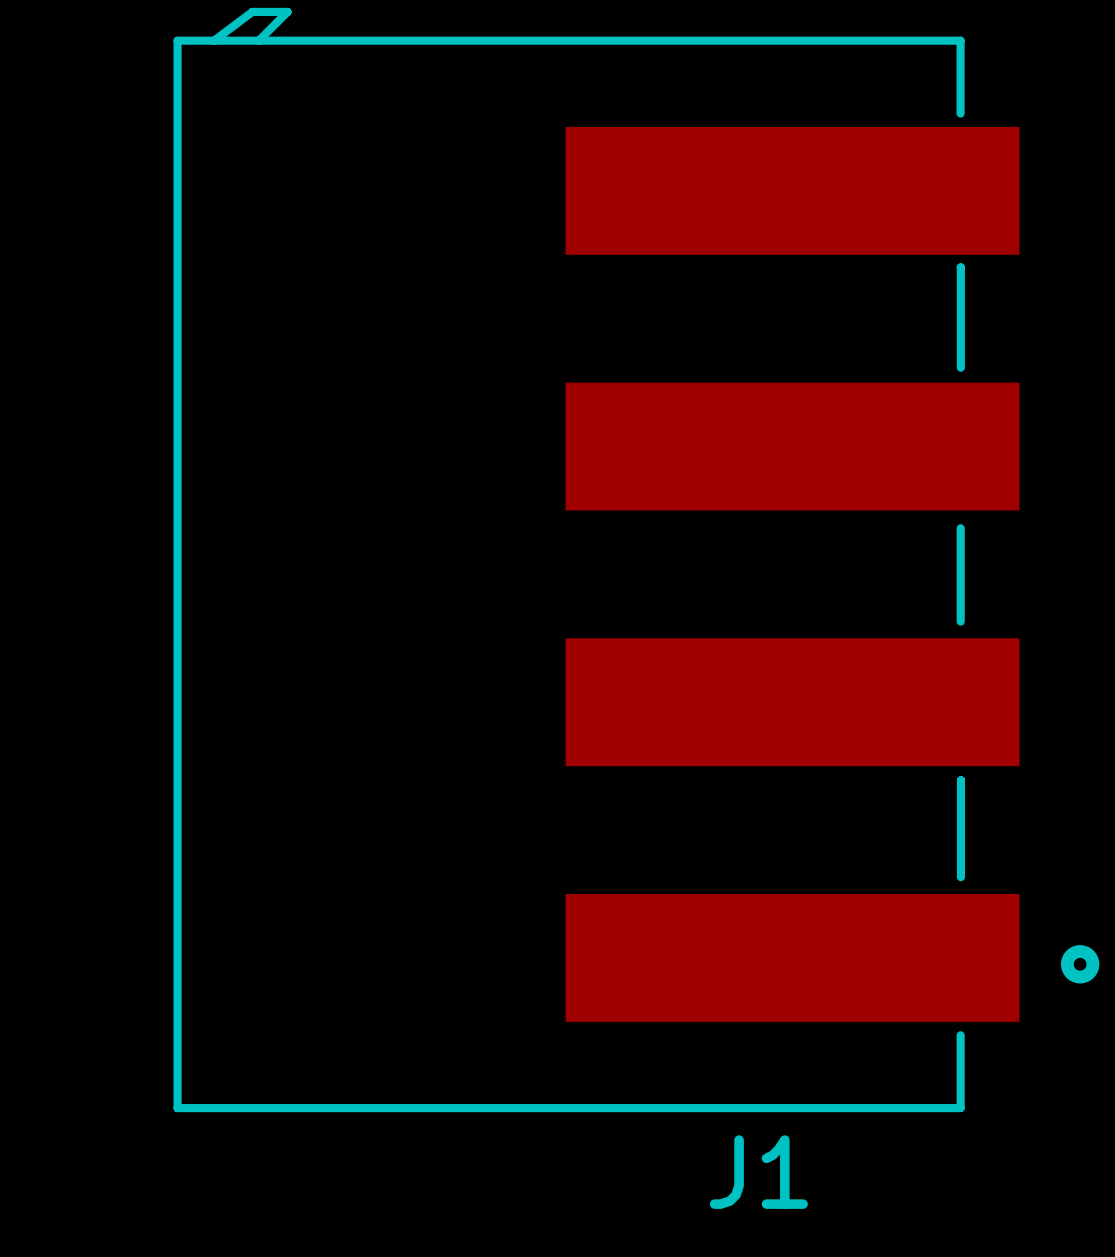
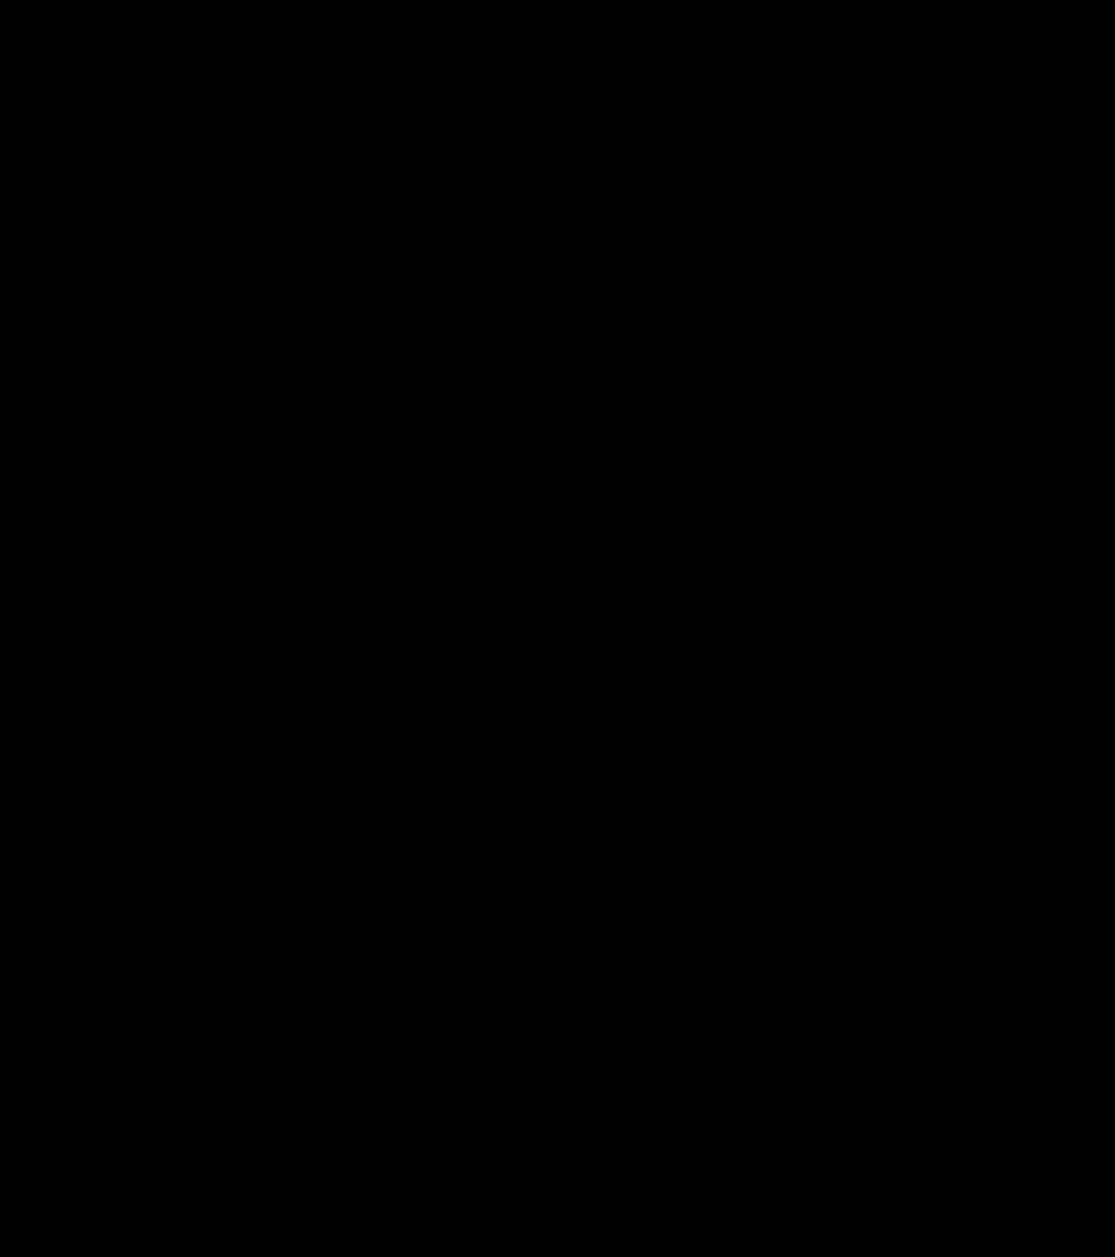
J1: (636, 560) -> none

